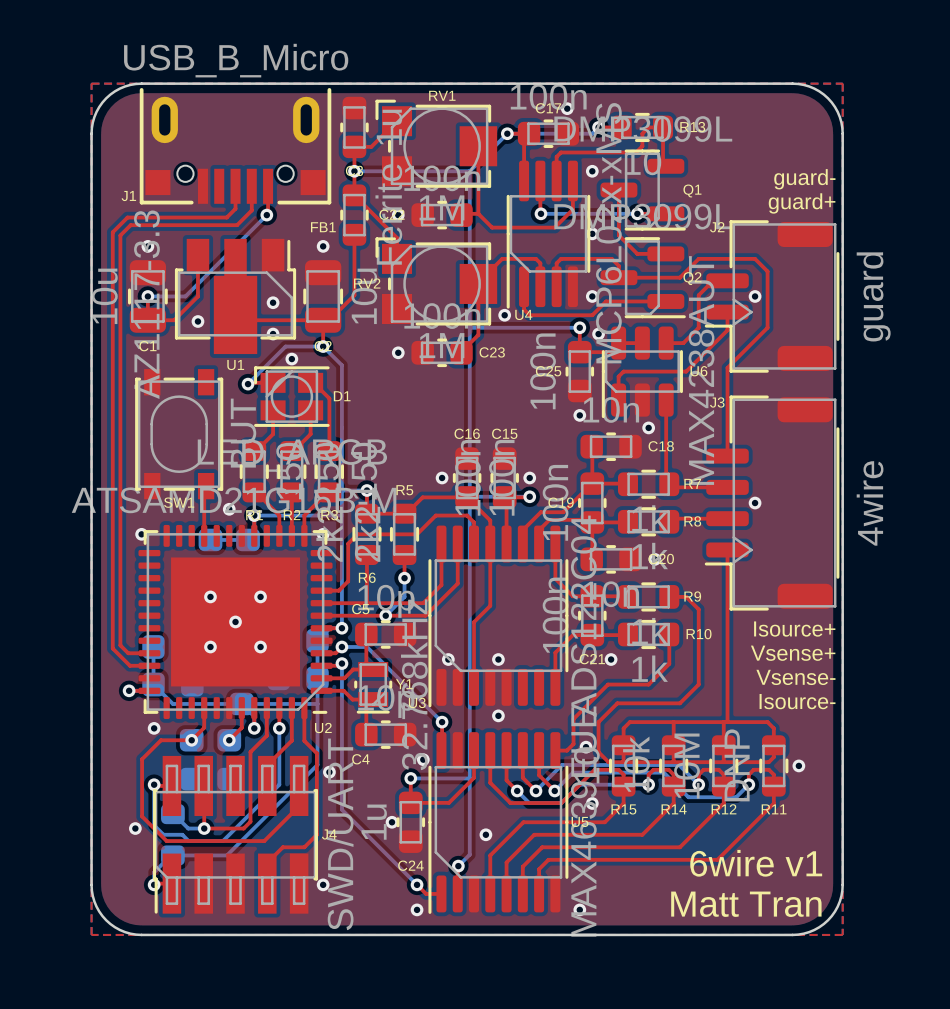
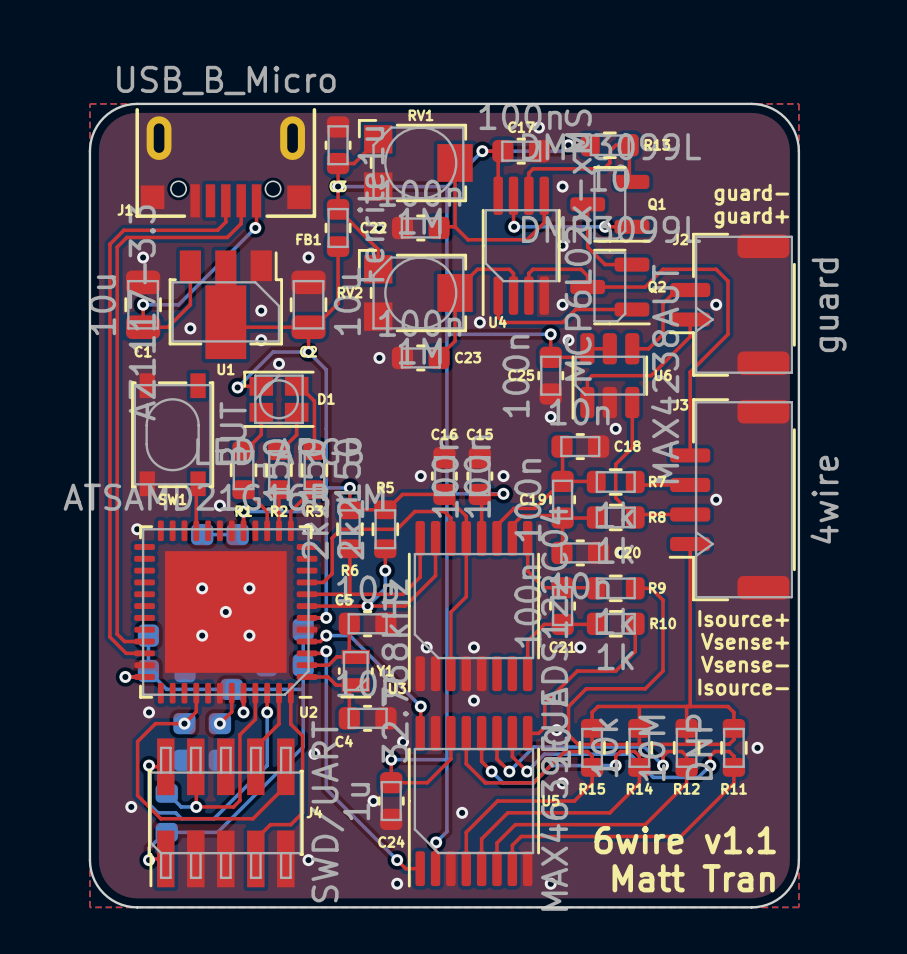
top track: (666, 447) (666, 481) (669, 484) -> (632, 447) (615, 464) (615, 497) (635, 517)
text: 6wire v1 (756, 863) -> 6wire v1.1 (685, 840)

